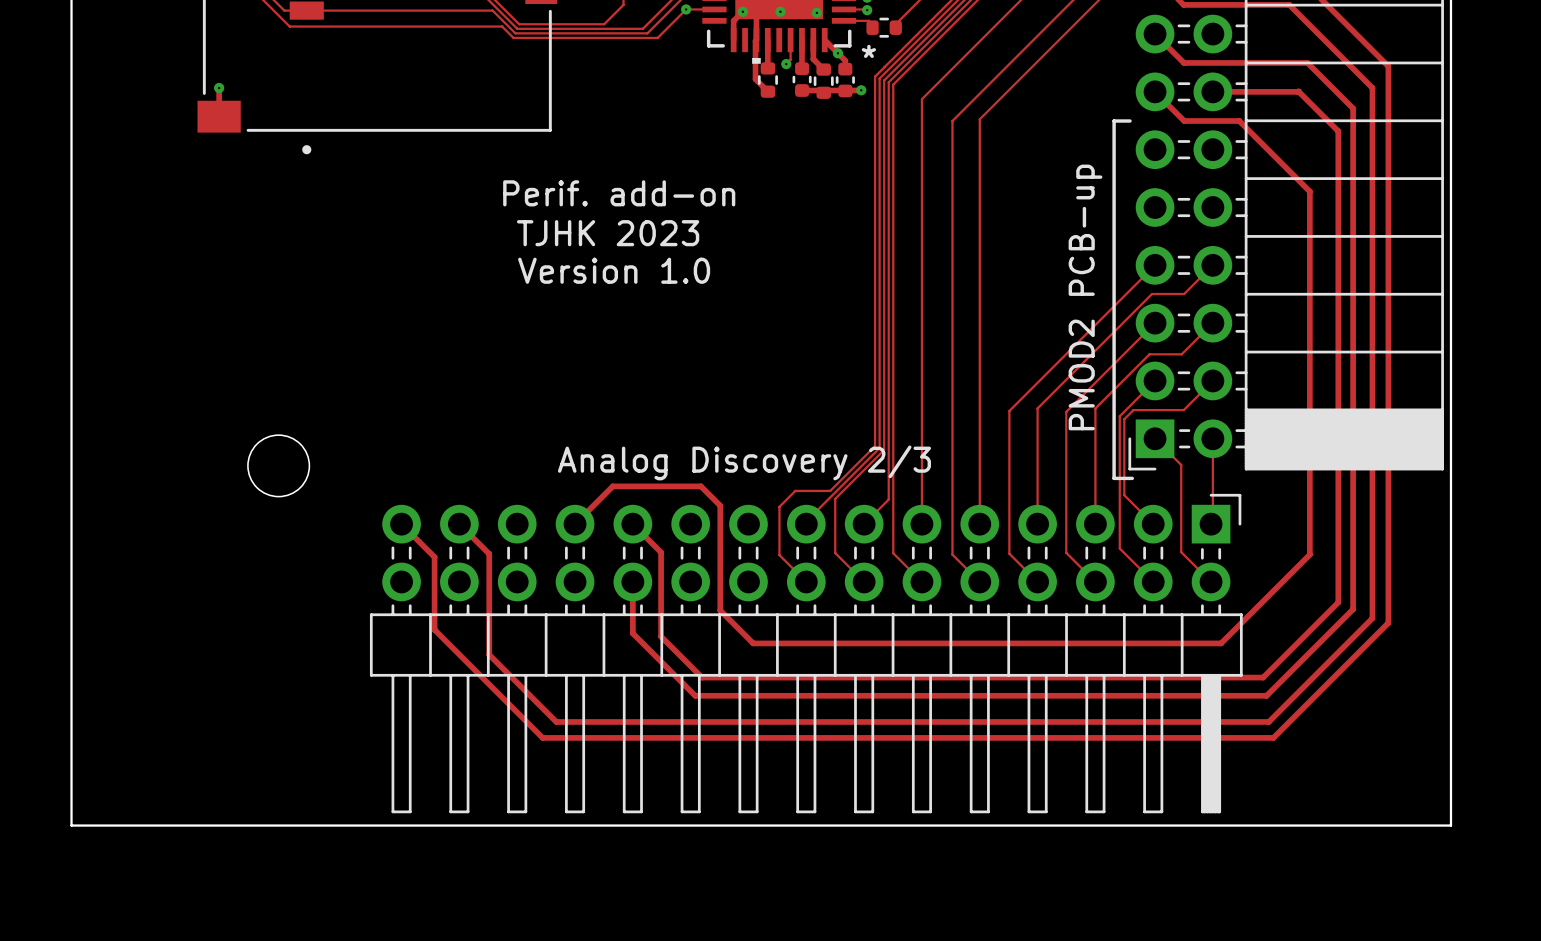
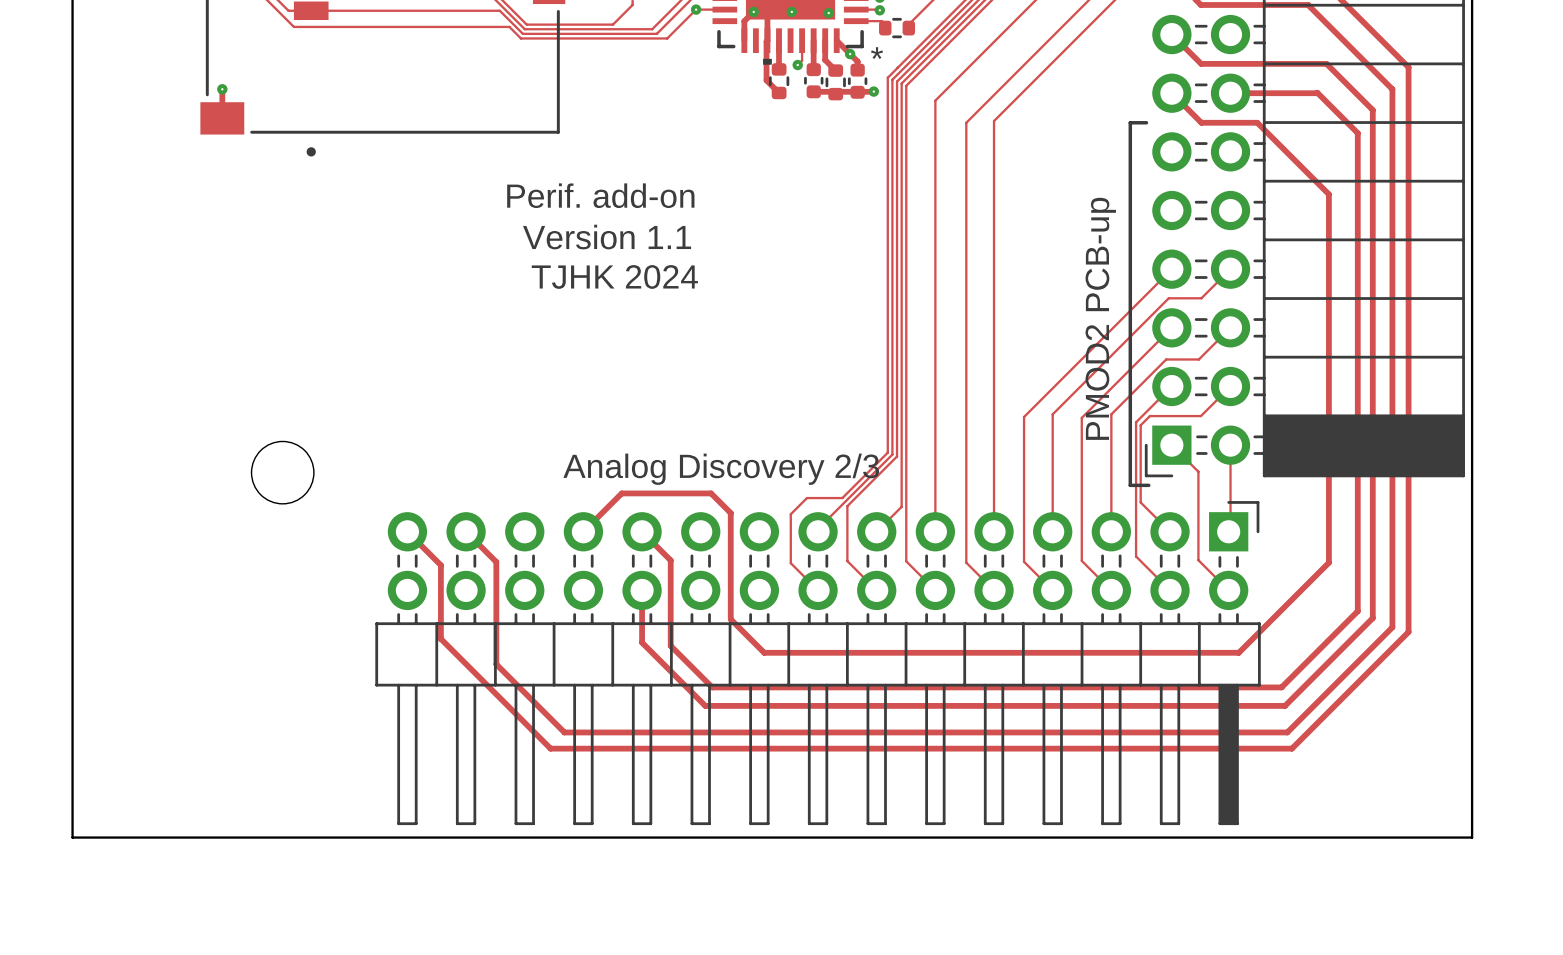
text: TJHK 2023 (608, 233) -> Version 1.1 (607, 237)
text: Version 1.0 (614, 270) -> TJHK 2024 (614, 276)

